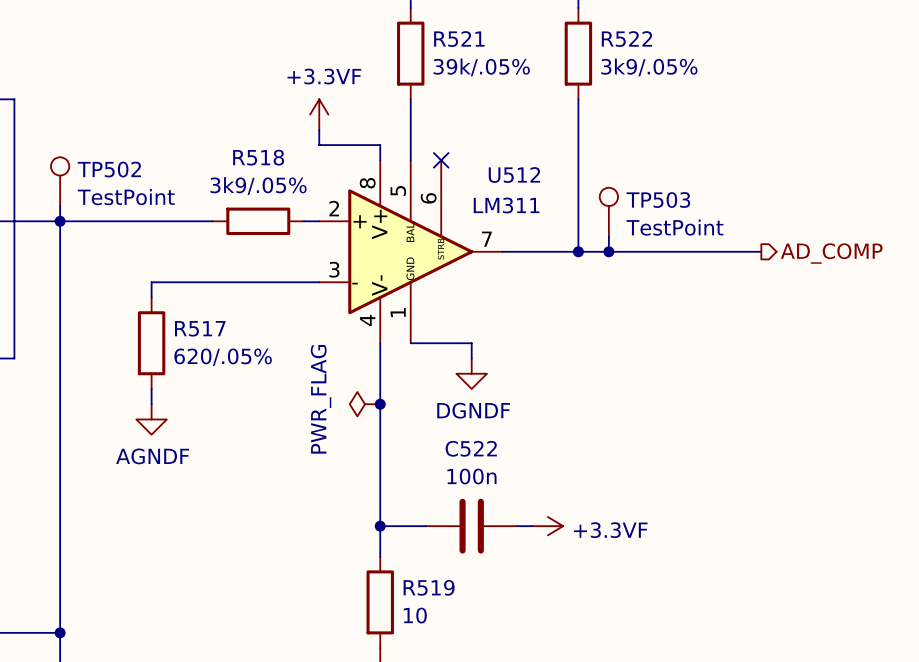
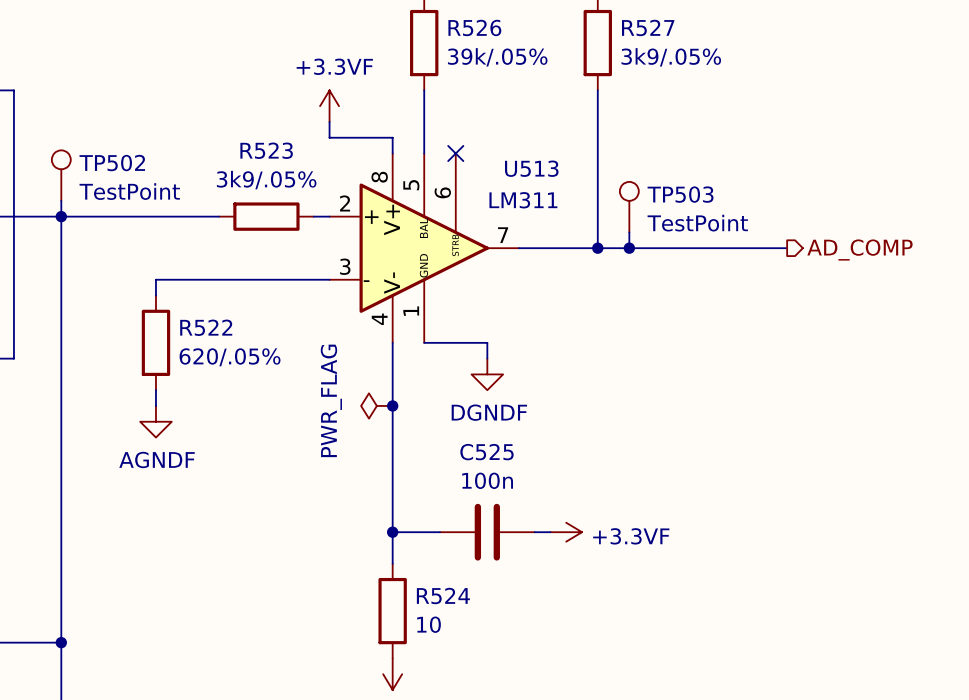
R521 name: R521 (459, 39) -> R526 (474, 27)
R522 name: R522 (626, 39) -> R527 (648, 27)
R518 name: R518 (258, 157) -> R523 (266, 150)
U512 name: U512 (514, 175) -> U513 (531, 168)
R517 name: R517 (200, 328) -> R522 (206, 327)
C522 name: C522 (471, 448) -> C525 (487, 452)
R519 name: R519 (429, 587) -> R524 (443, 596)

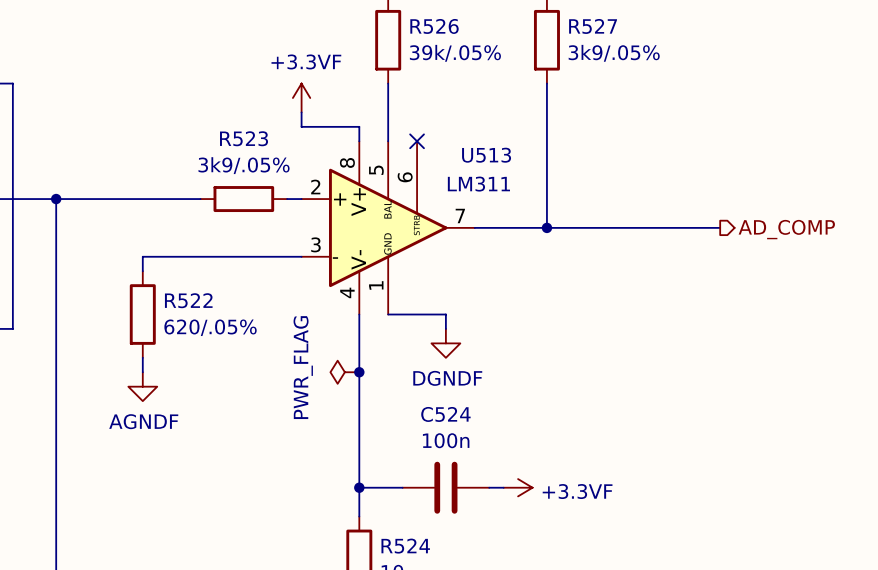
TP502: TestPoint (61, 175) -> none
wire: (61, 200) (61, 216) -> none
TP503: TestPoint (629, 207) -> none
wire: (629, 232) (629, 248) -> none
junction: (629, 248) -> none
C525 name: C525 (487, 452) -> C524 (445, 414)

